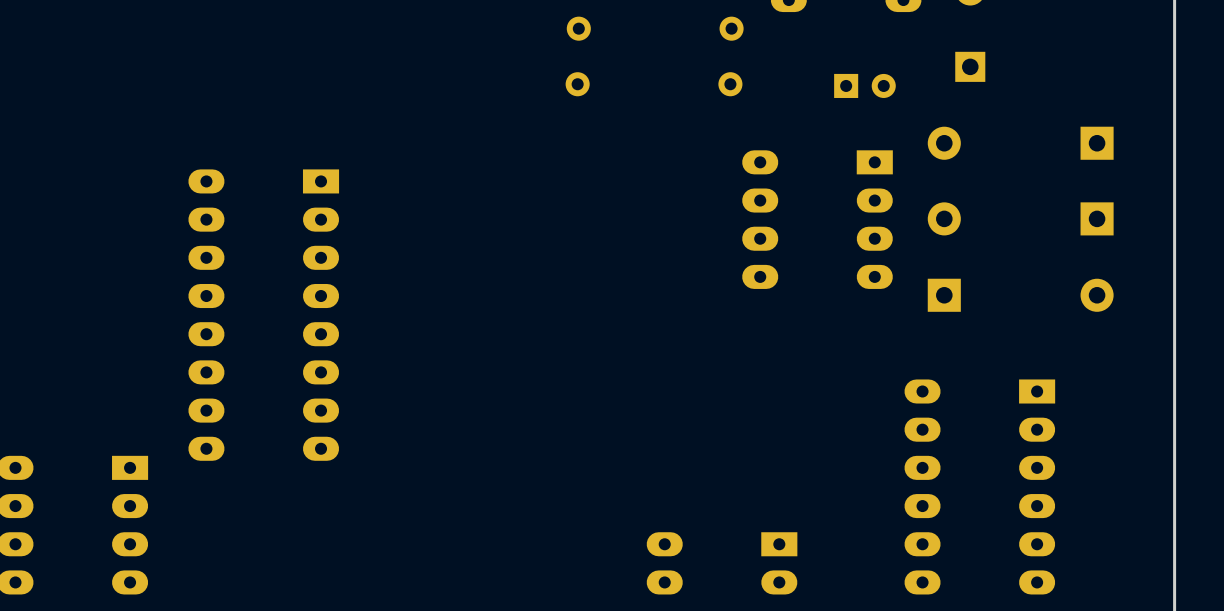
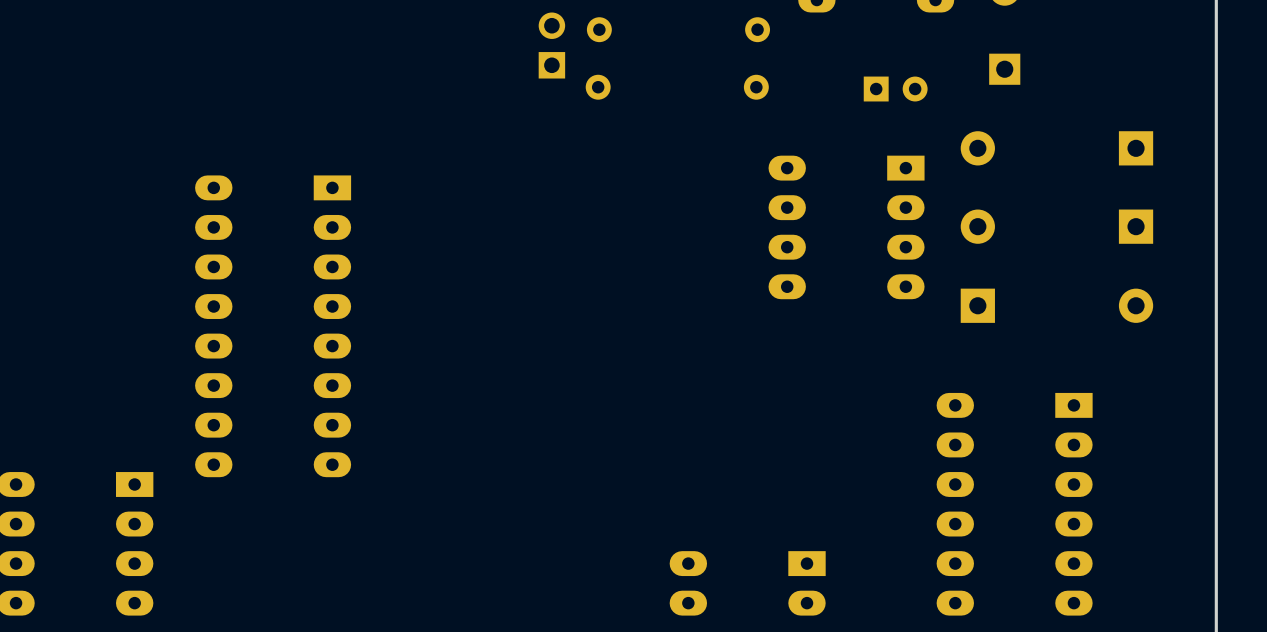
part: none -> (551, 45)

